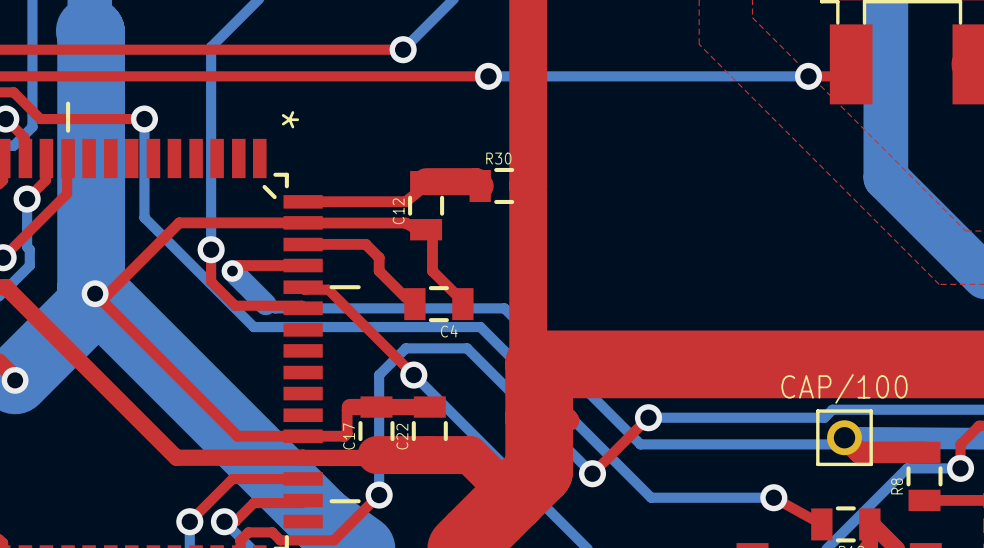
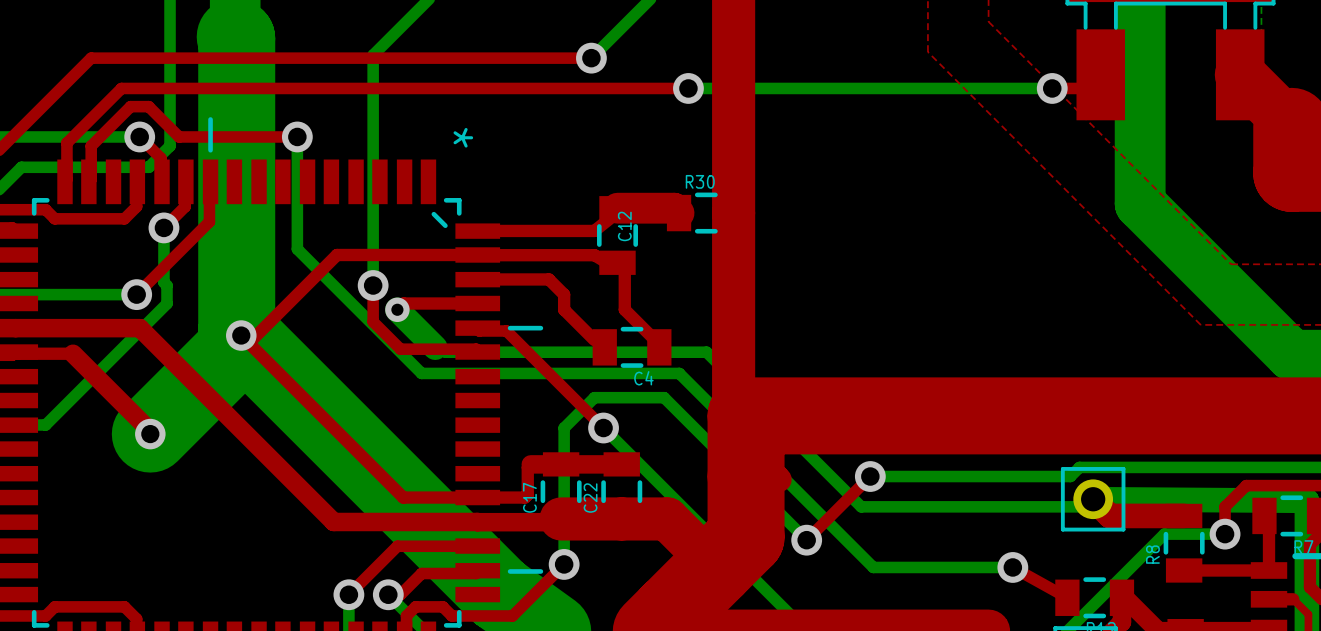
C12 name position: C12 (398, 211) -> C12 (624, 226)
CAP/100 name: CAP/100 (844, 388) -> none

